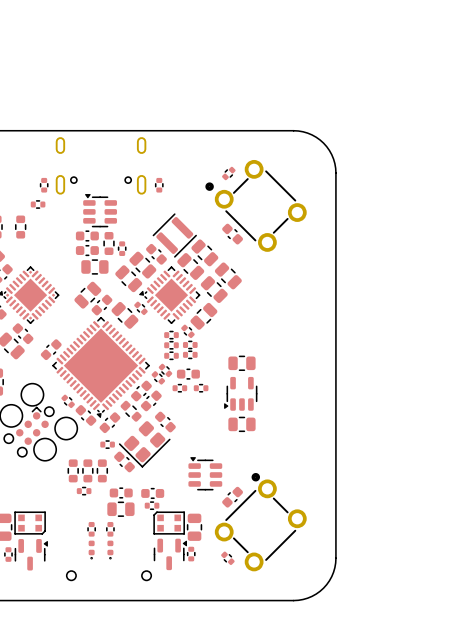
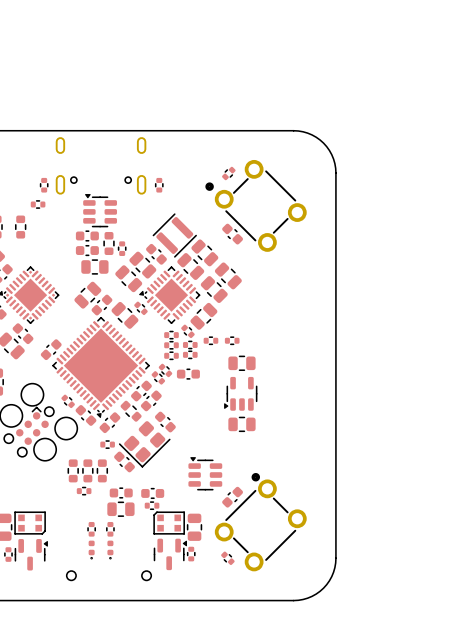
part: none -> (210, 340)
part: none -> (232, 340)
part: (179, 388) -> none
part: (201, 388) -> none

